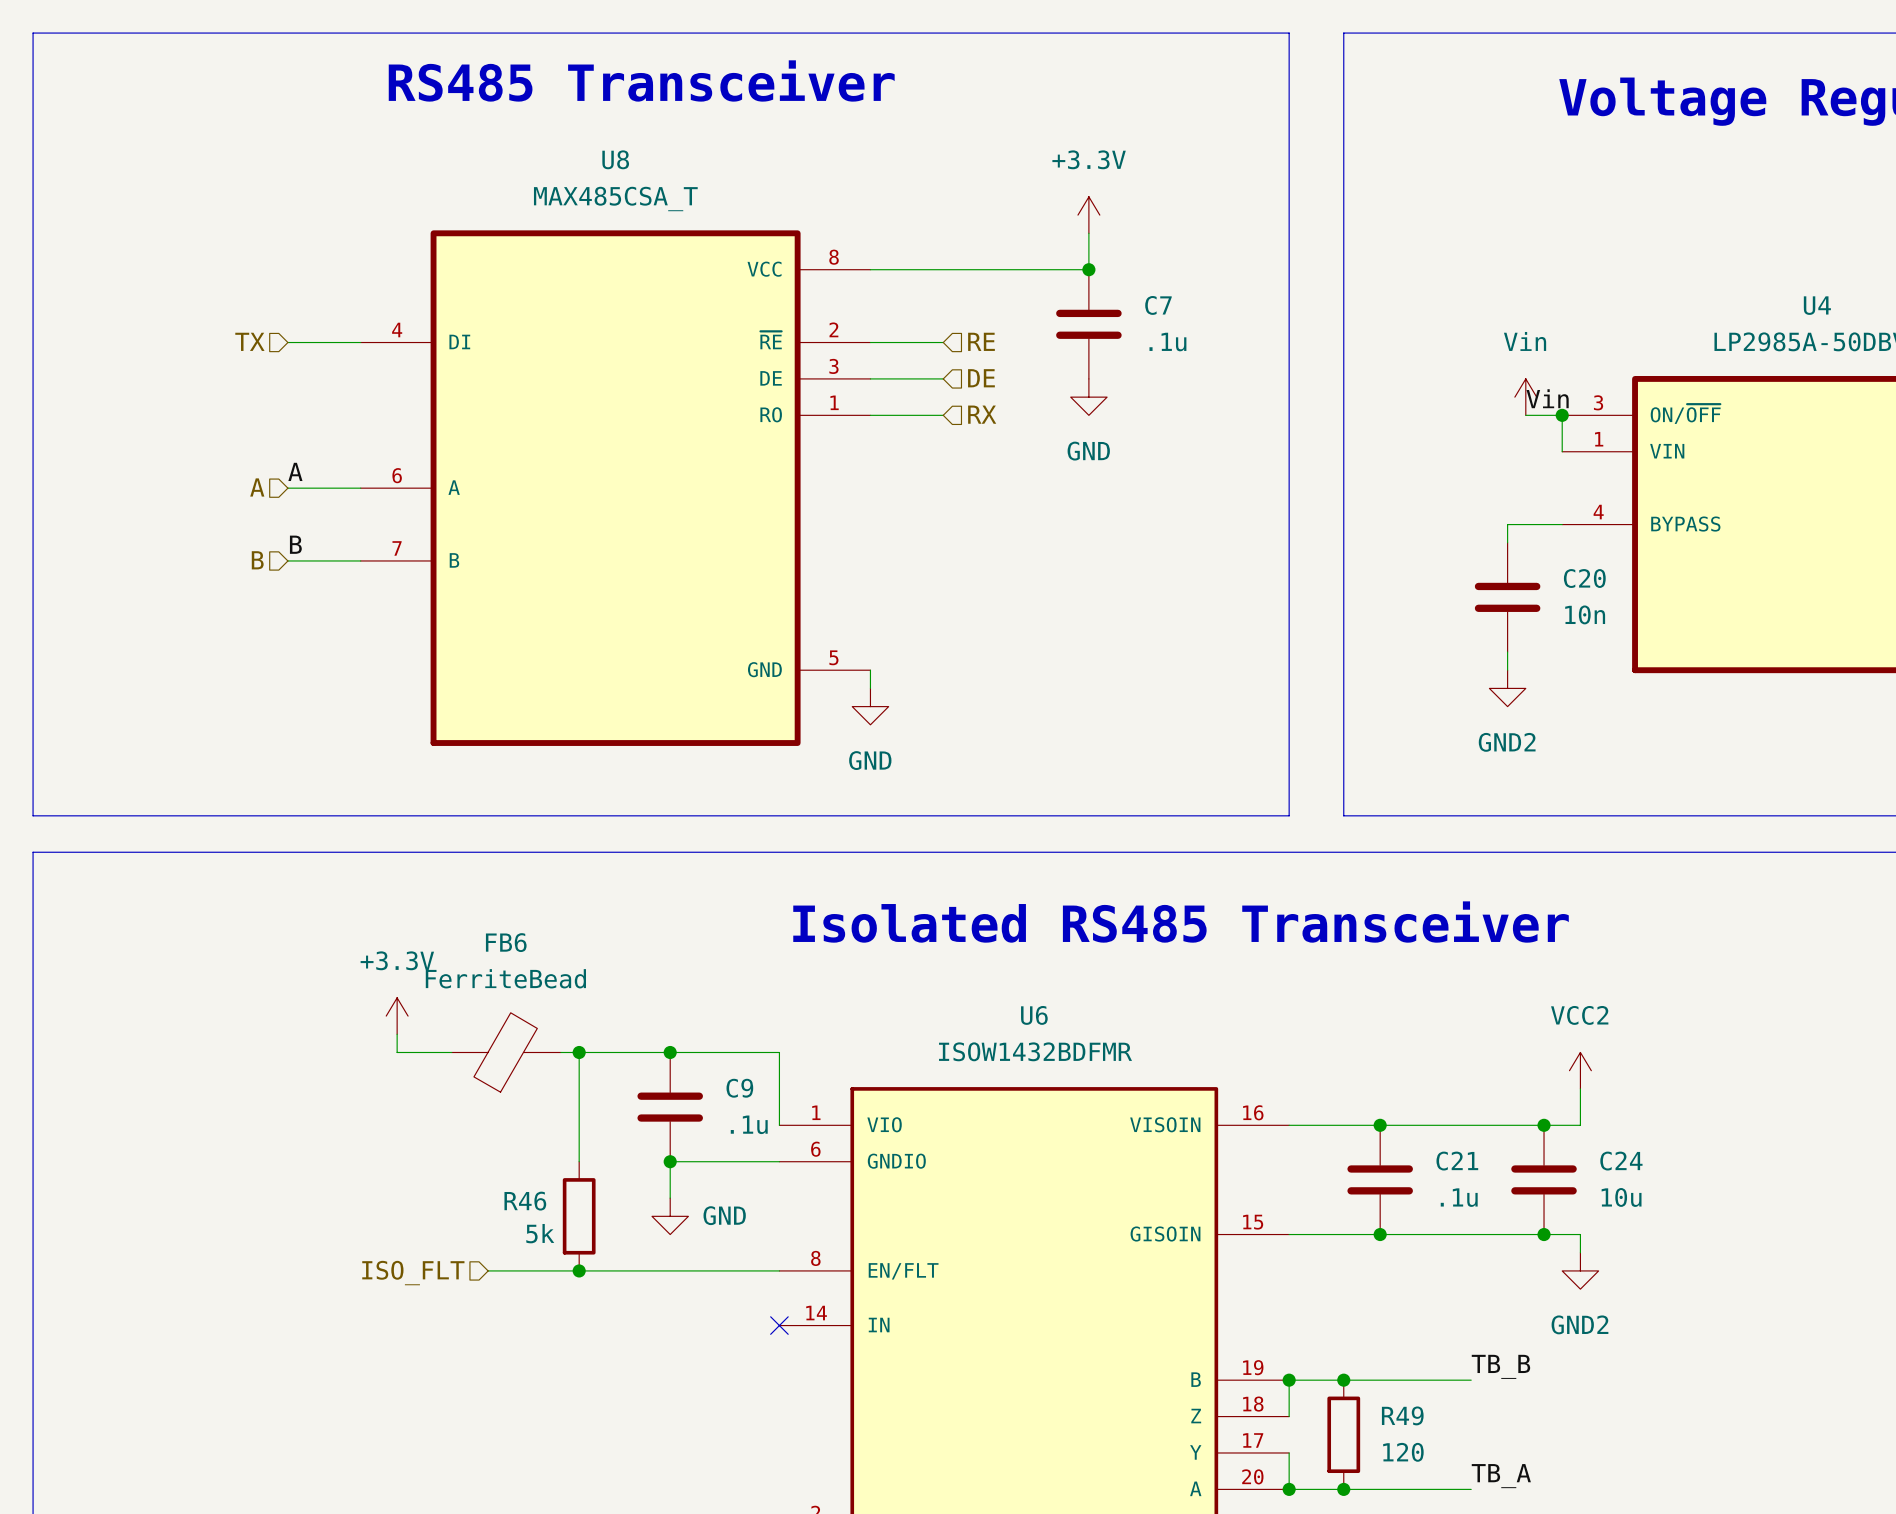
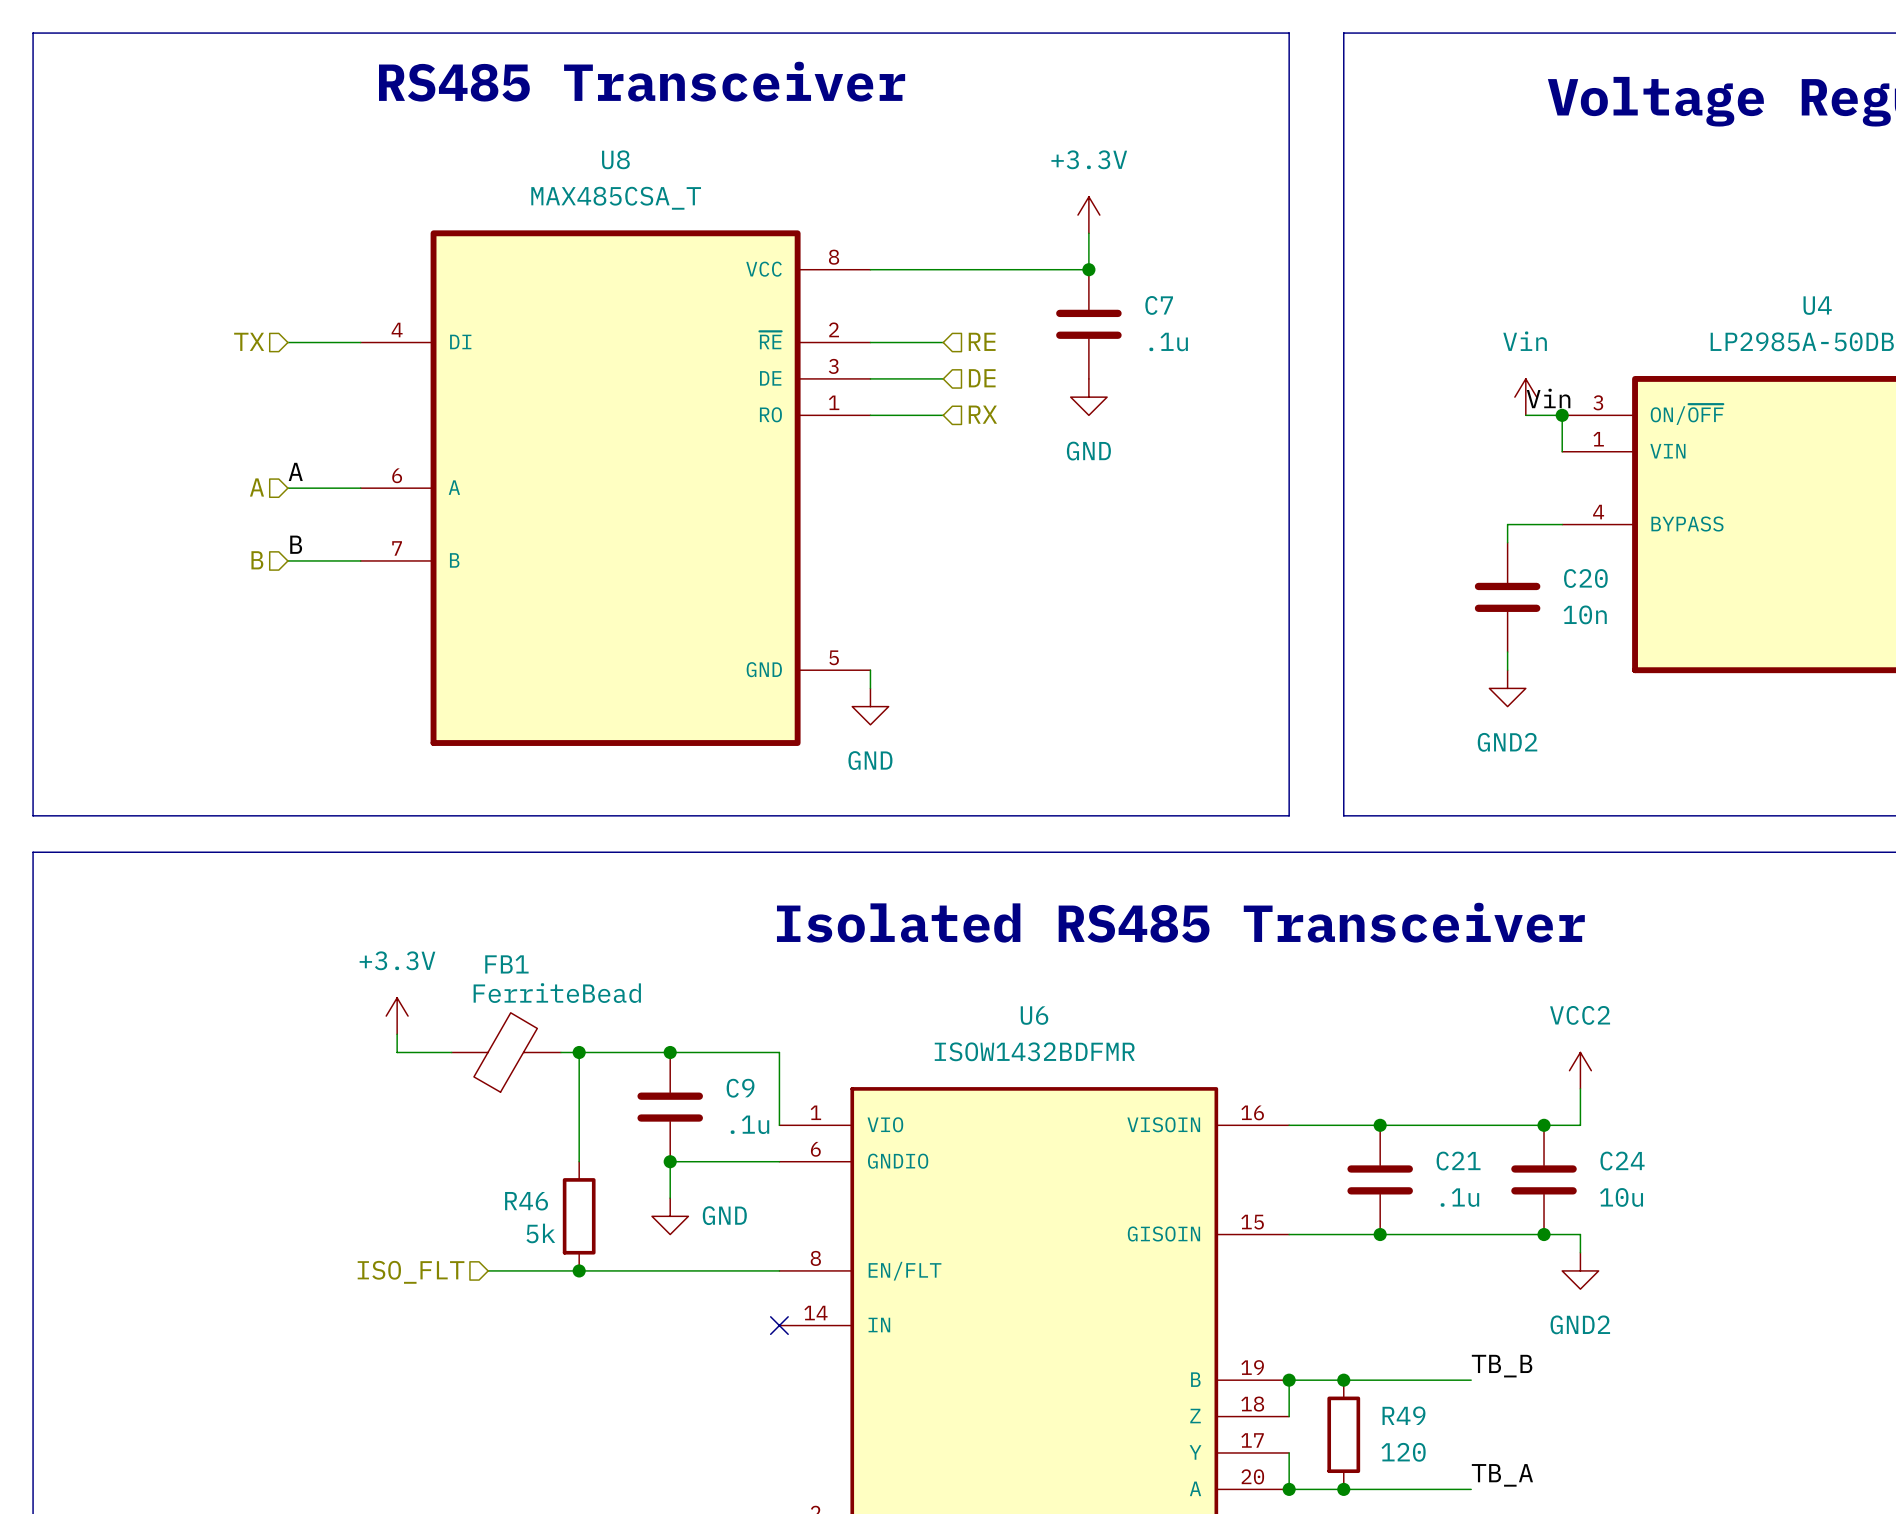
FB6 name: FB6 (506, 942) -> FB1 (506, 964)
FB6 value position: FerriteBead (505, 978) -> FerriteBead (557, 993)

